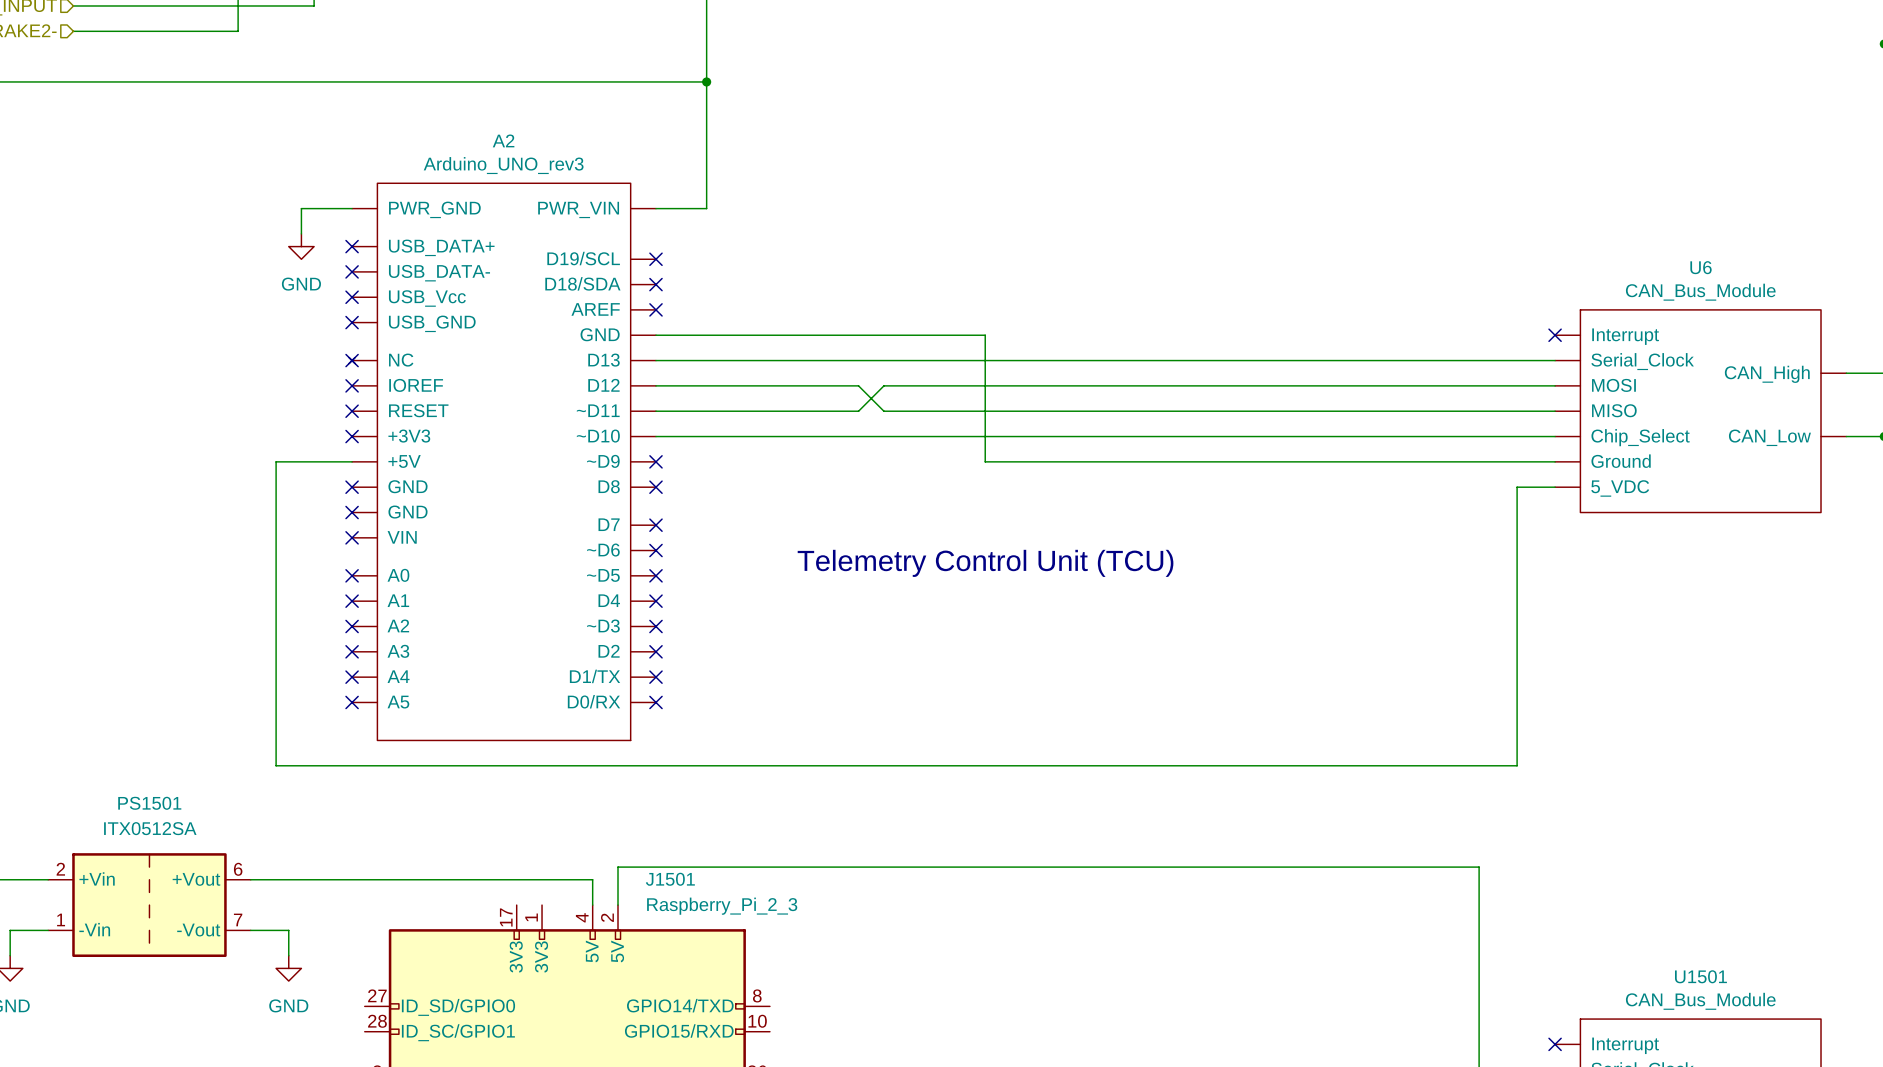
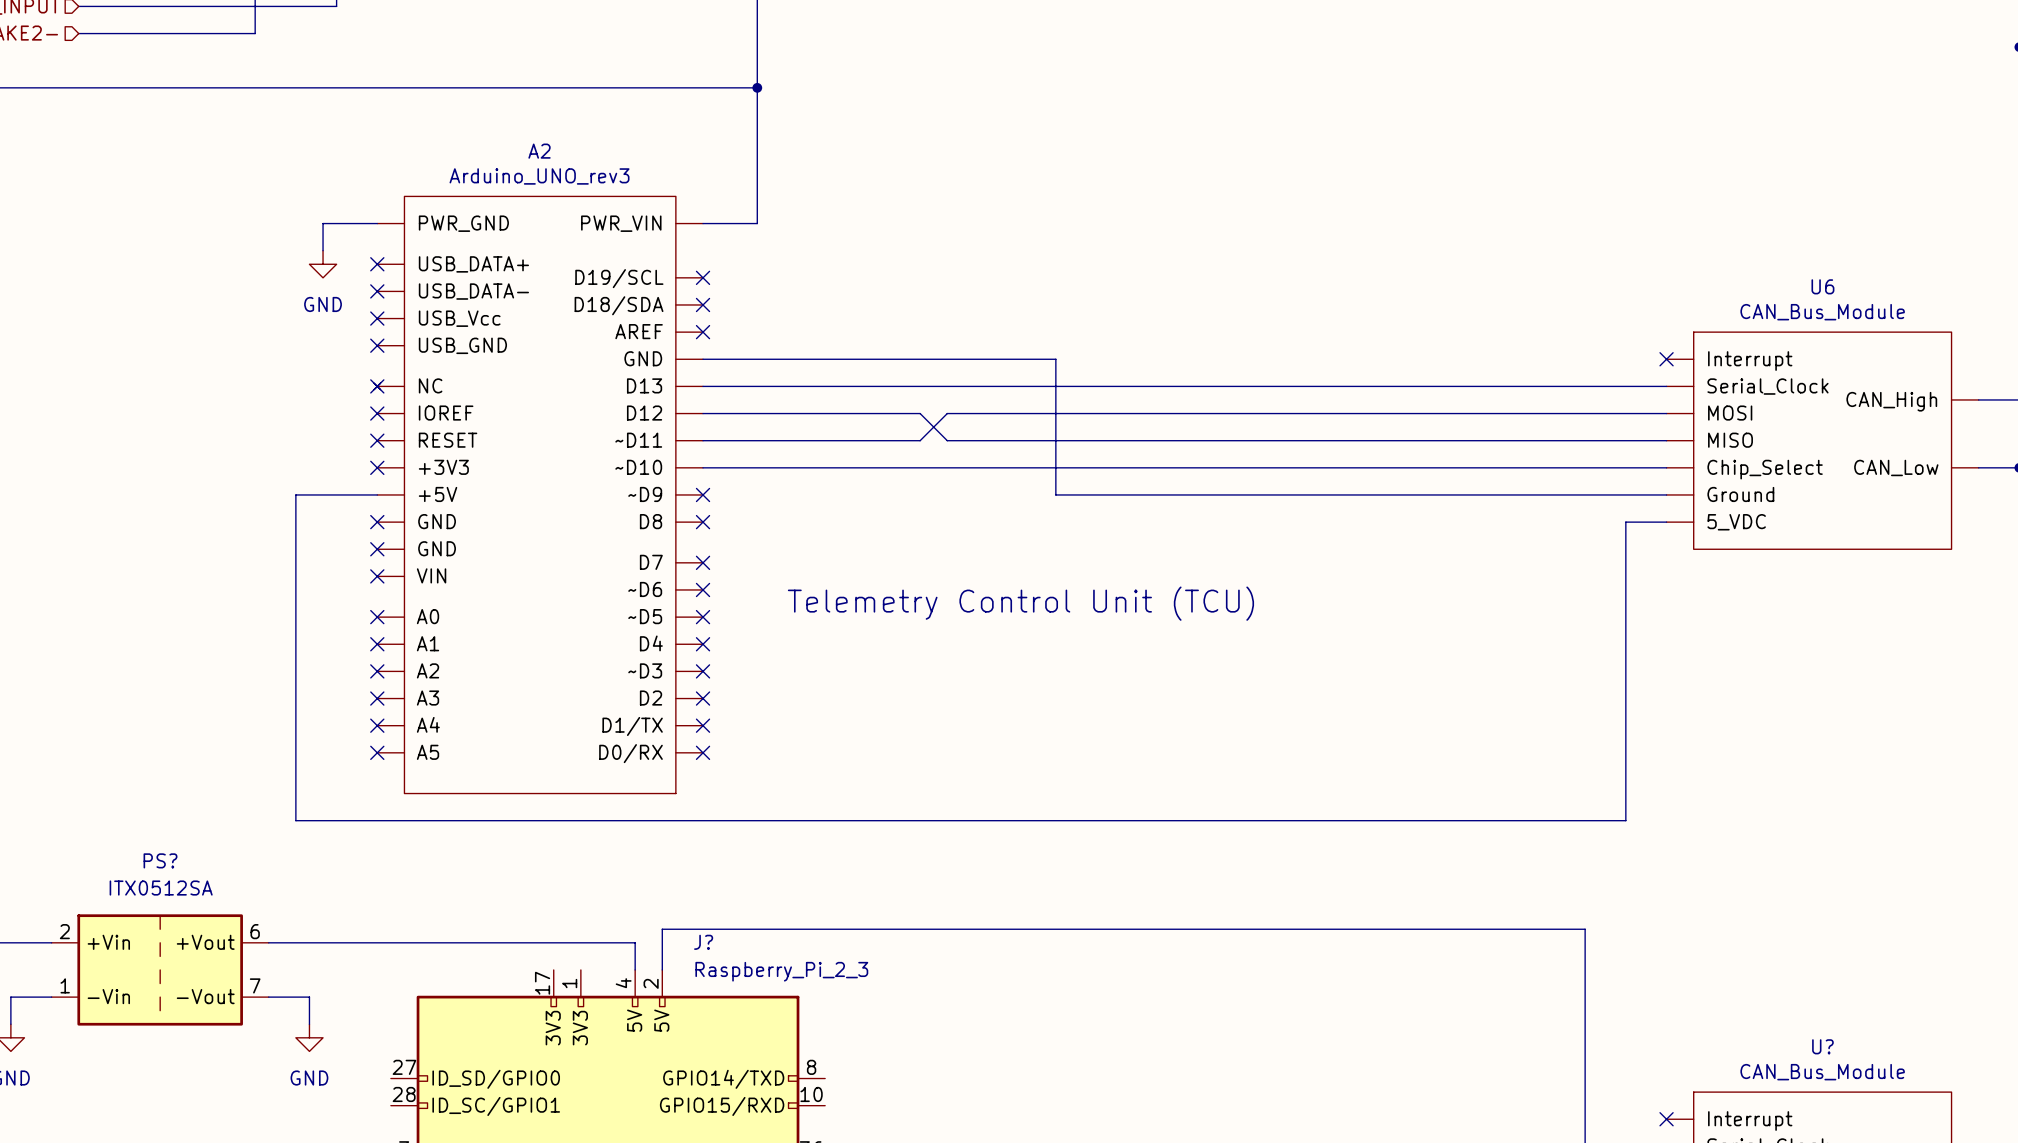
PS1501 name: PS1501 (149, 803) -> PS? (160, 860)
J1501 name: J1501 (670, 879) -> J? (703, 942)
U1501 name: U1501 (1700, 976) -> U? (1822, 1046)

